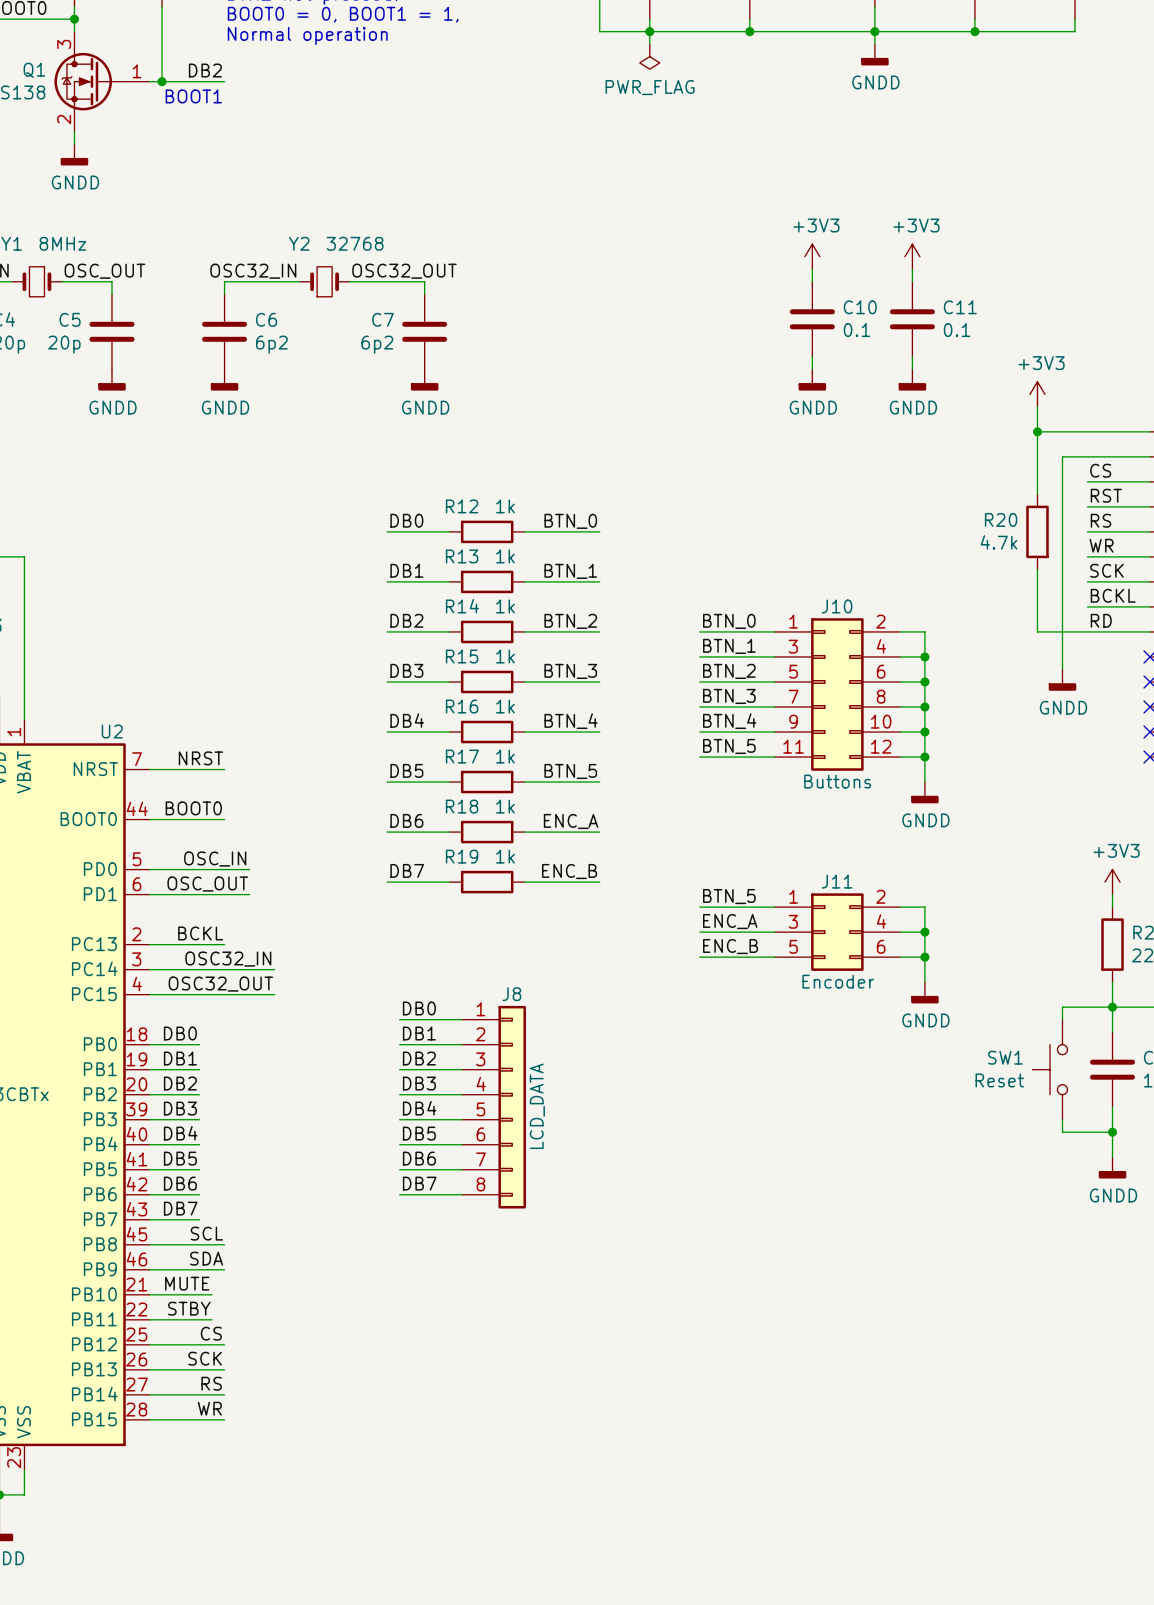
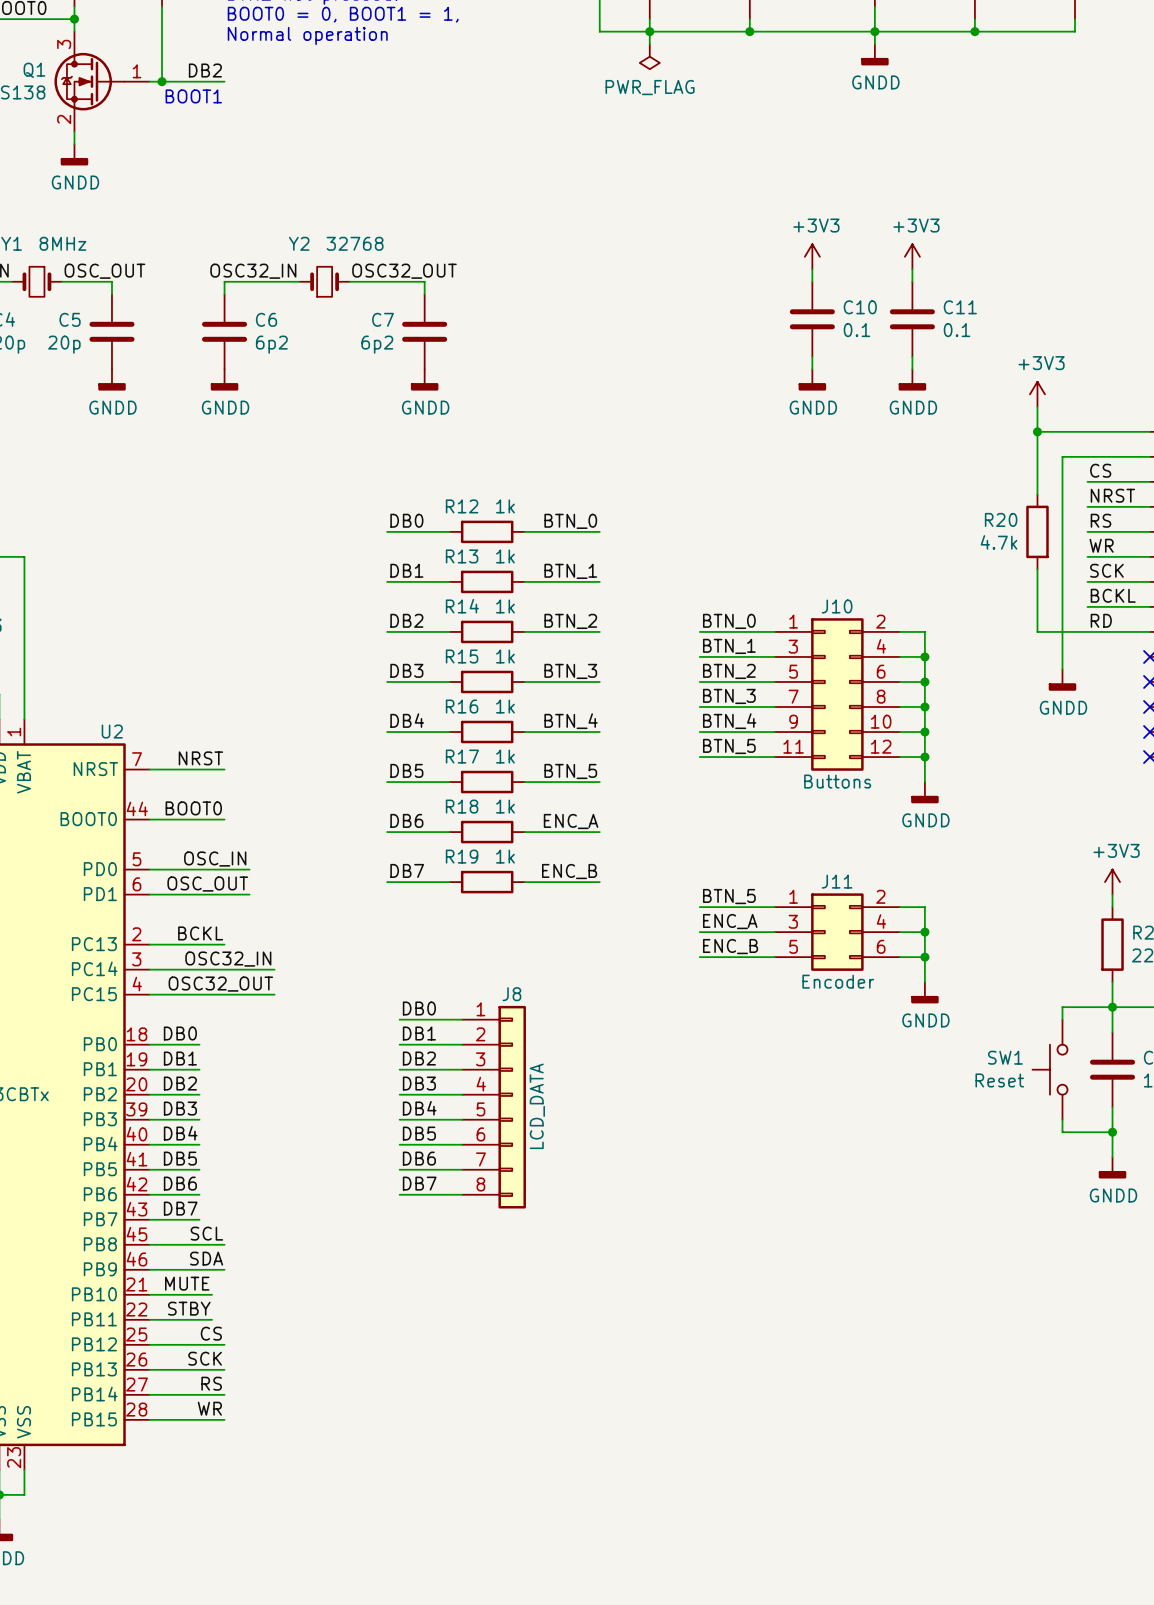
label: RST (1106, 495) -> NRST (1112, 495)

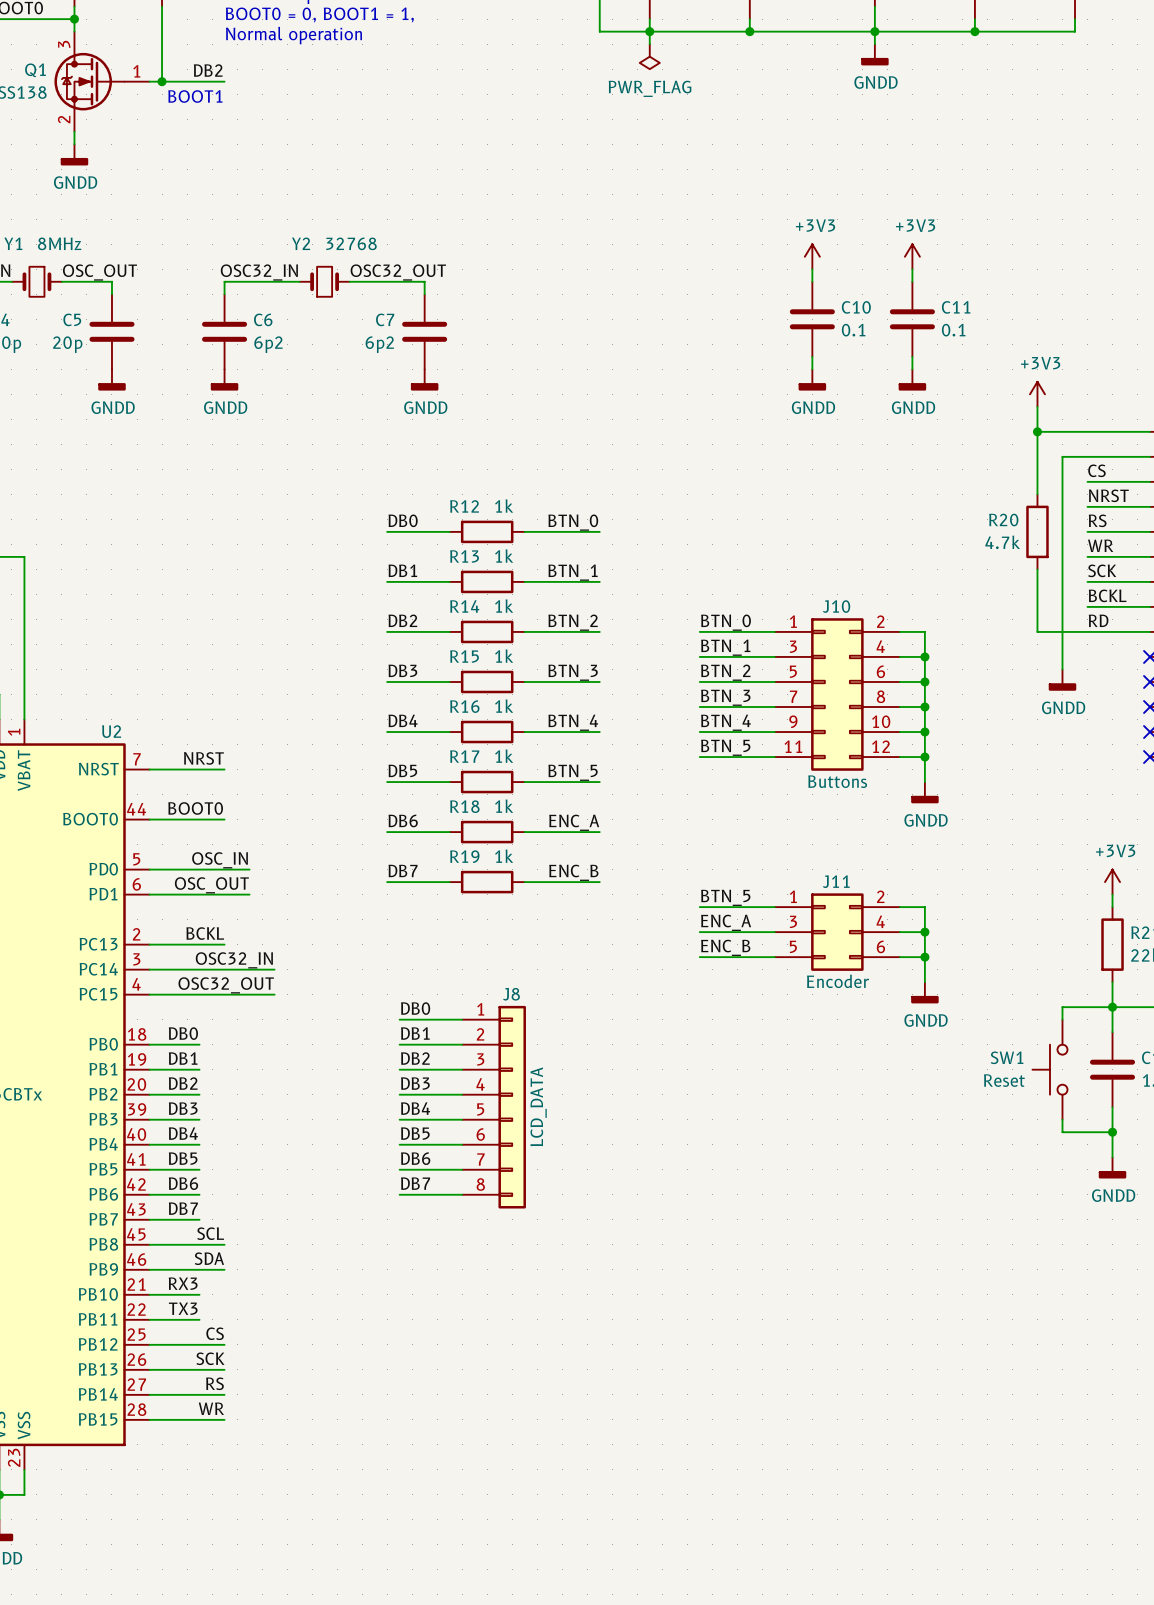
label: none -> RX3 (183, 1283)
label: MUTE (187, 1283) -> none
wire: (199, 1294) (212, 1294) -> none
label: none -> TX3 (183, 1308)
label: STBY (189, 1308) -> none
wire: (199, 1319) (212, 1319) -> none

